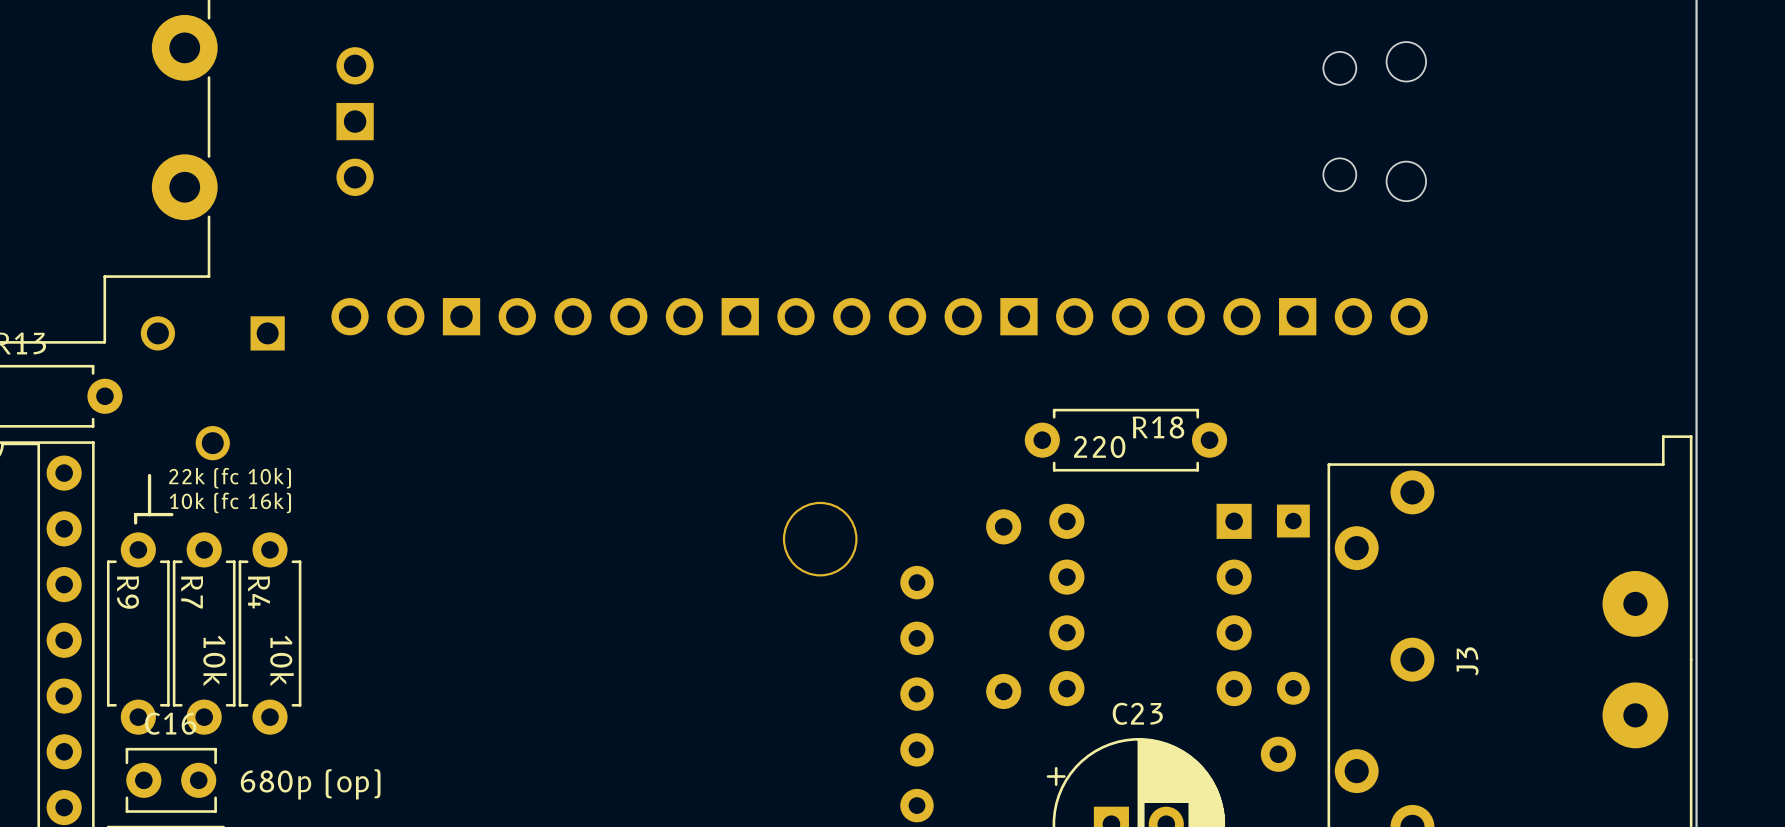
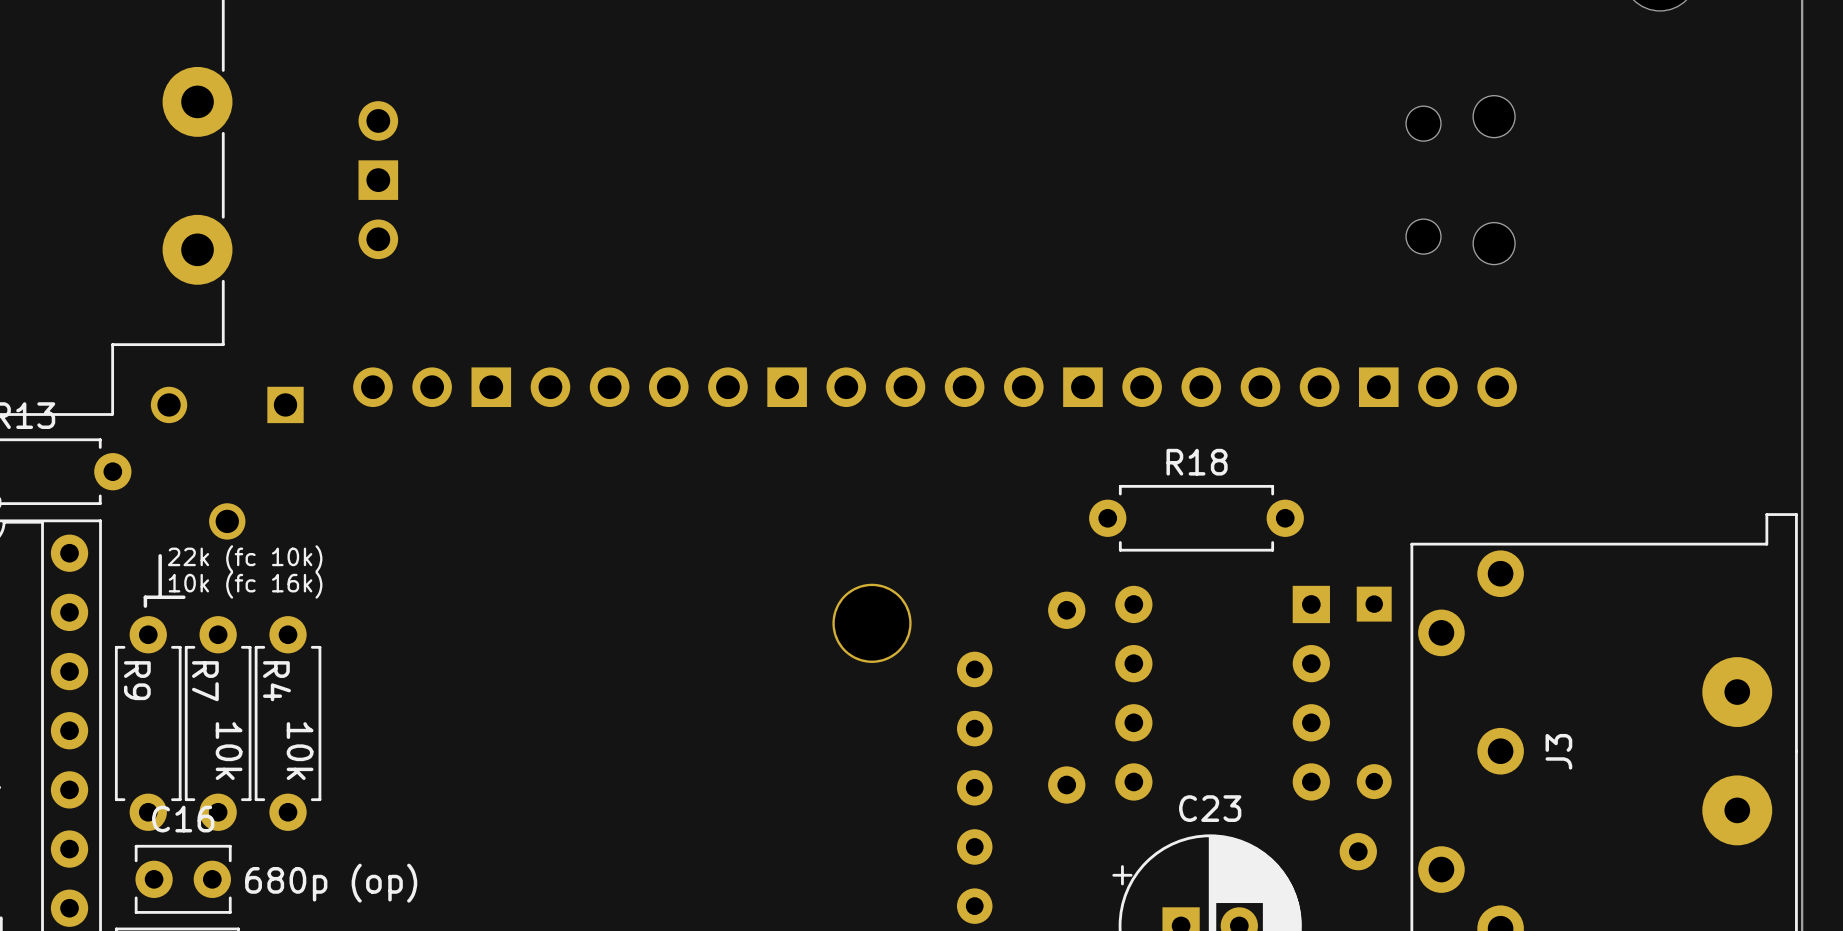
R18 name position: R18 (1158, 427) -> R18 (1197, 462)
text: 220 (1099, 447) -> none

